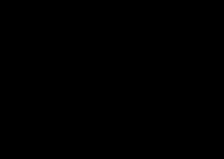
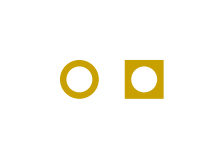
part: none -> (111, 79)

